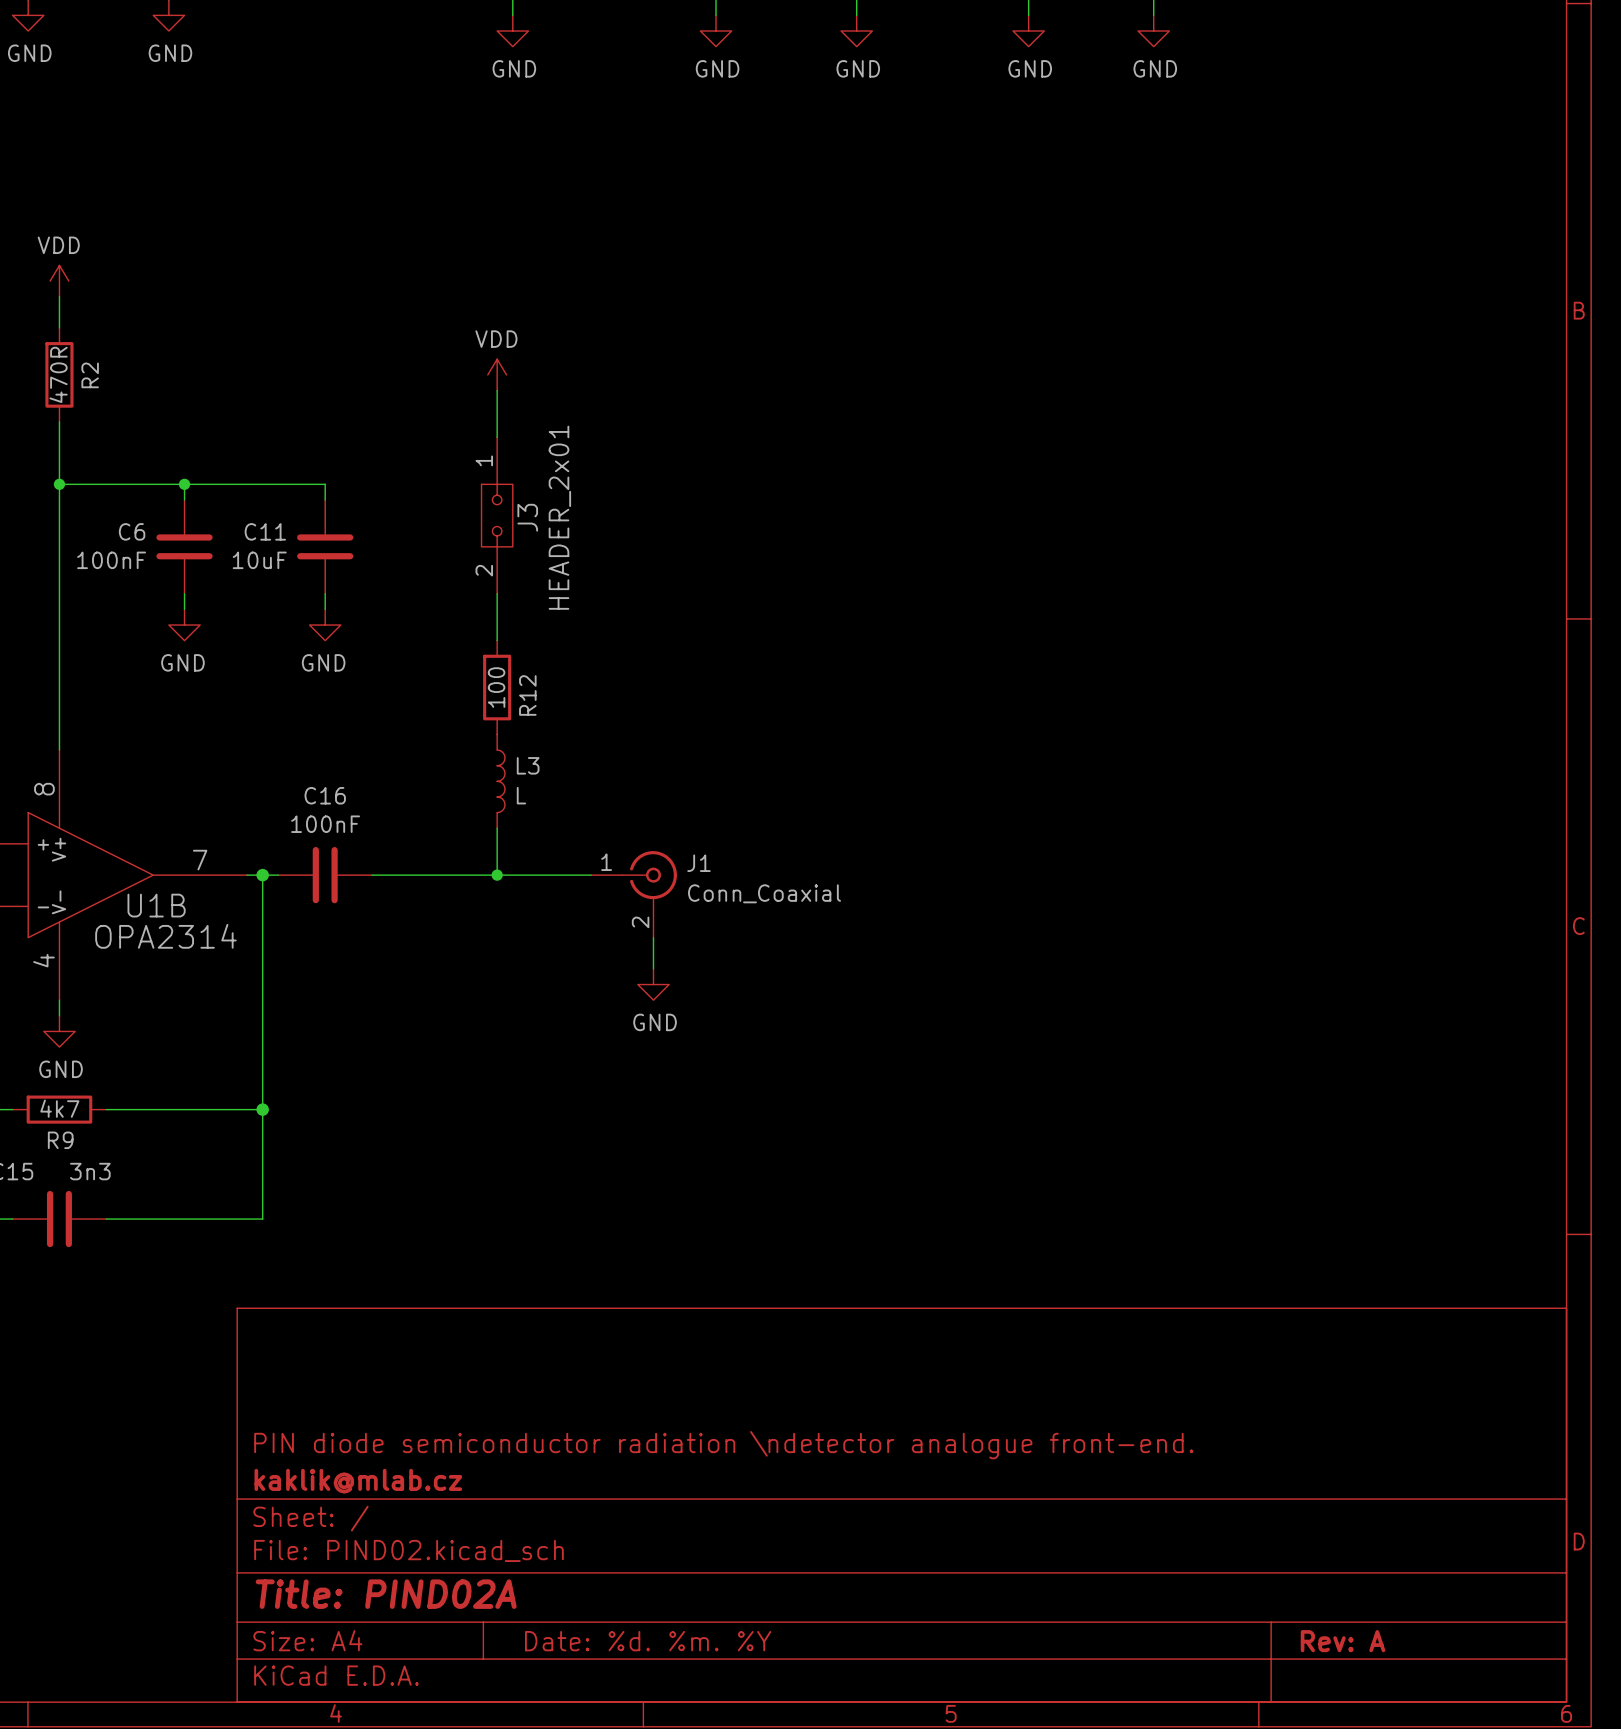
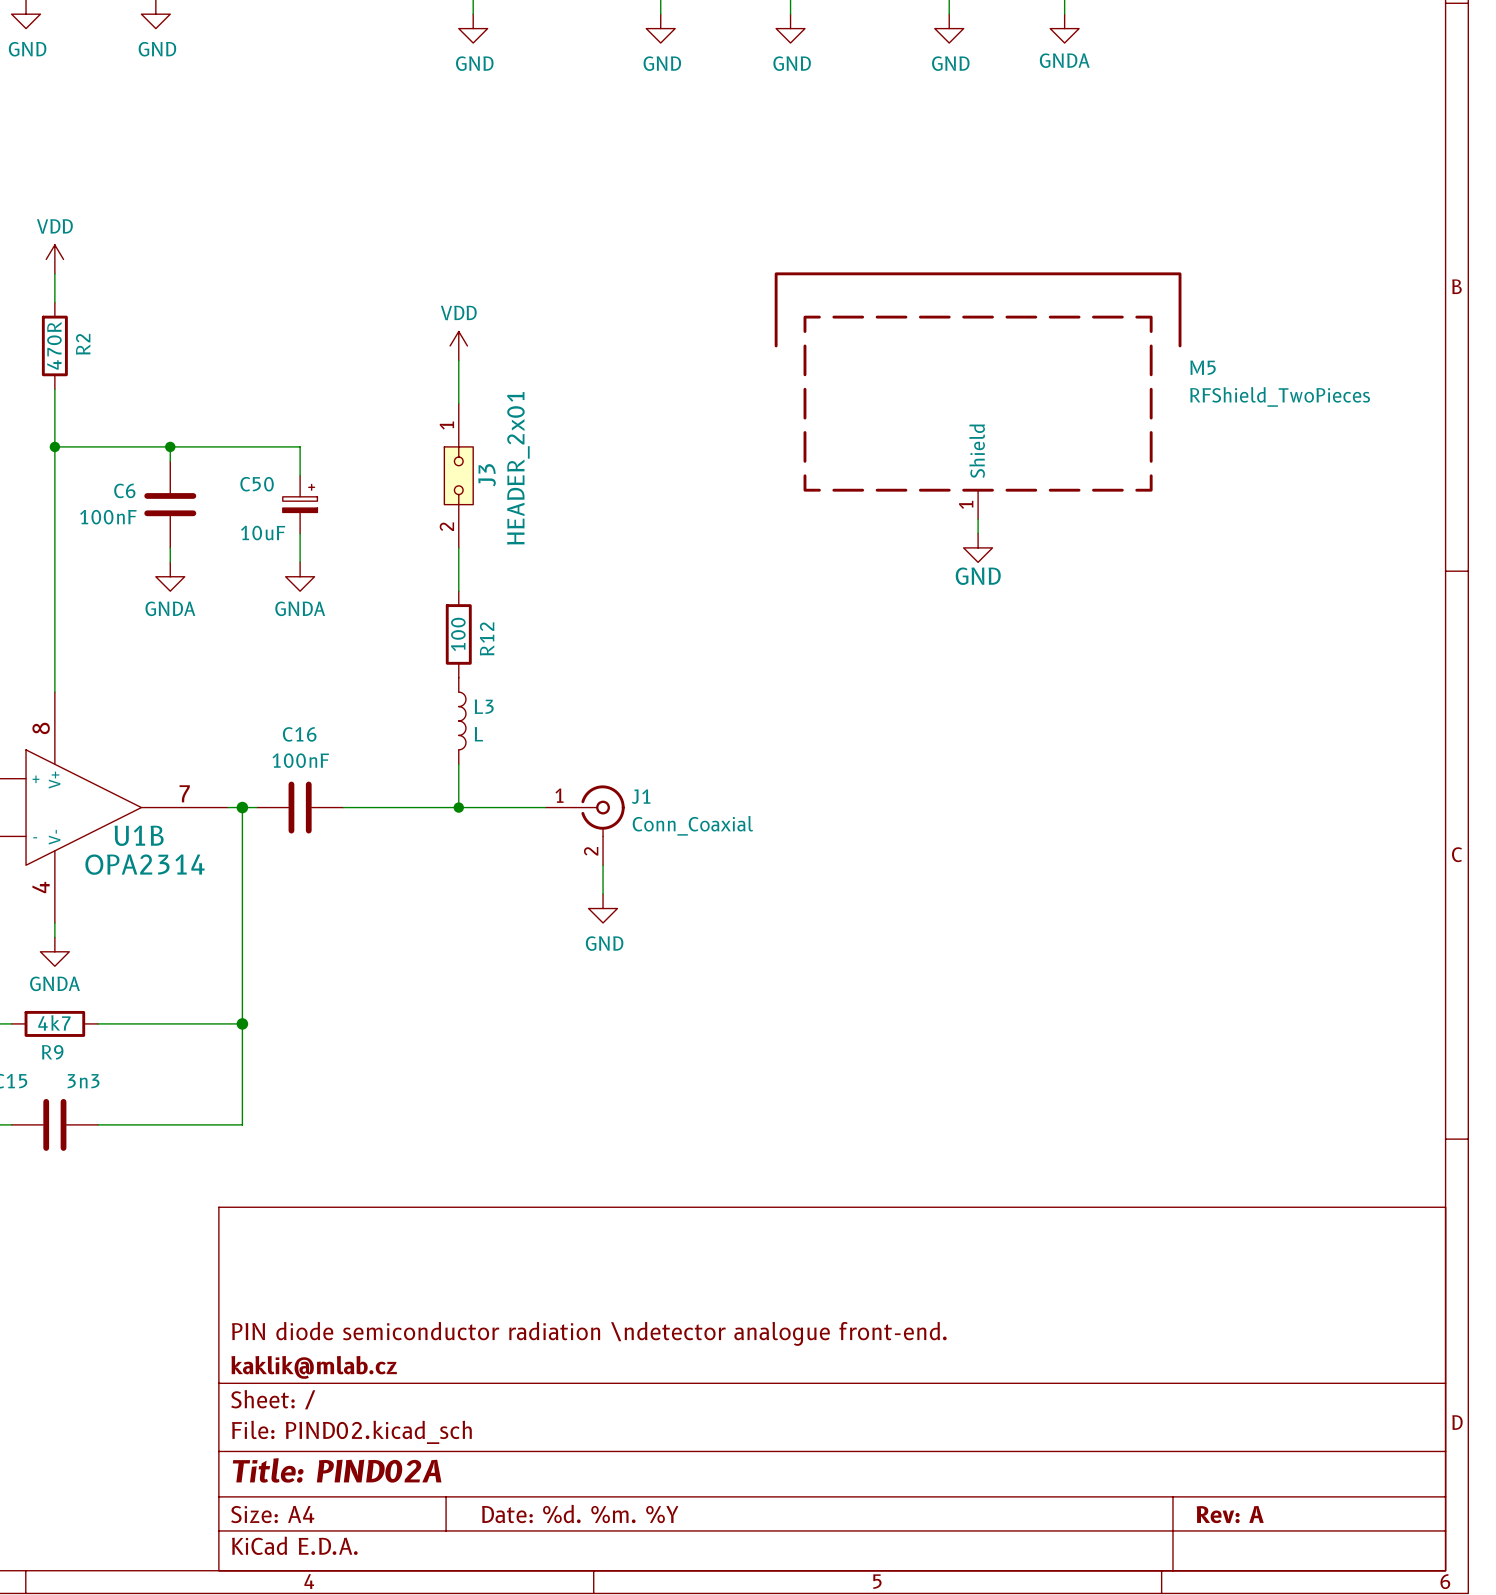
power symbol: GND (1153, 31) -> GNDA (1064, 28)
M5: none -> RFShield_TwoPieces (978, 395)
C11: 10uF (325, 546) -> none
C50: none -> 10uF (300, 504)
wire: none -> (978, 519) (978, 533)
power symbol: none -> GND (978, 547)
power symbol: GND (184, 625) -> GNDA (170, 576)
power symbol: GND (325, 625) -> GNDA (300, 576)
power symbol: GND (59, 1031) -> GNDA (54, 951)

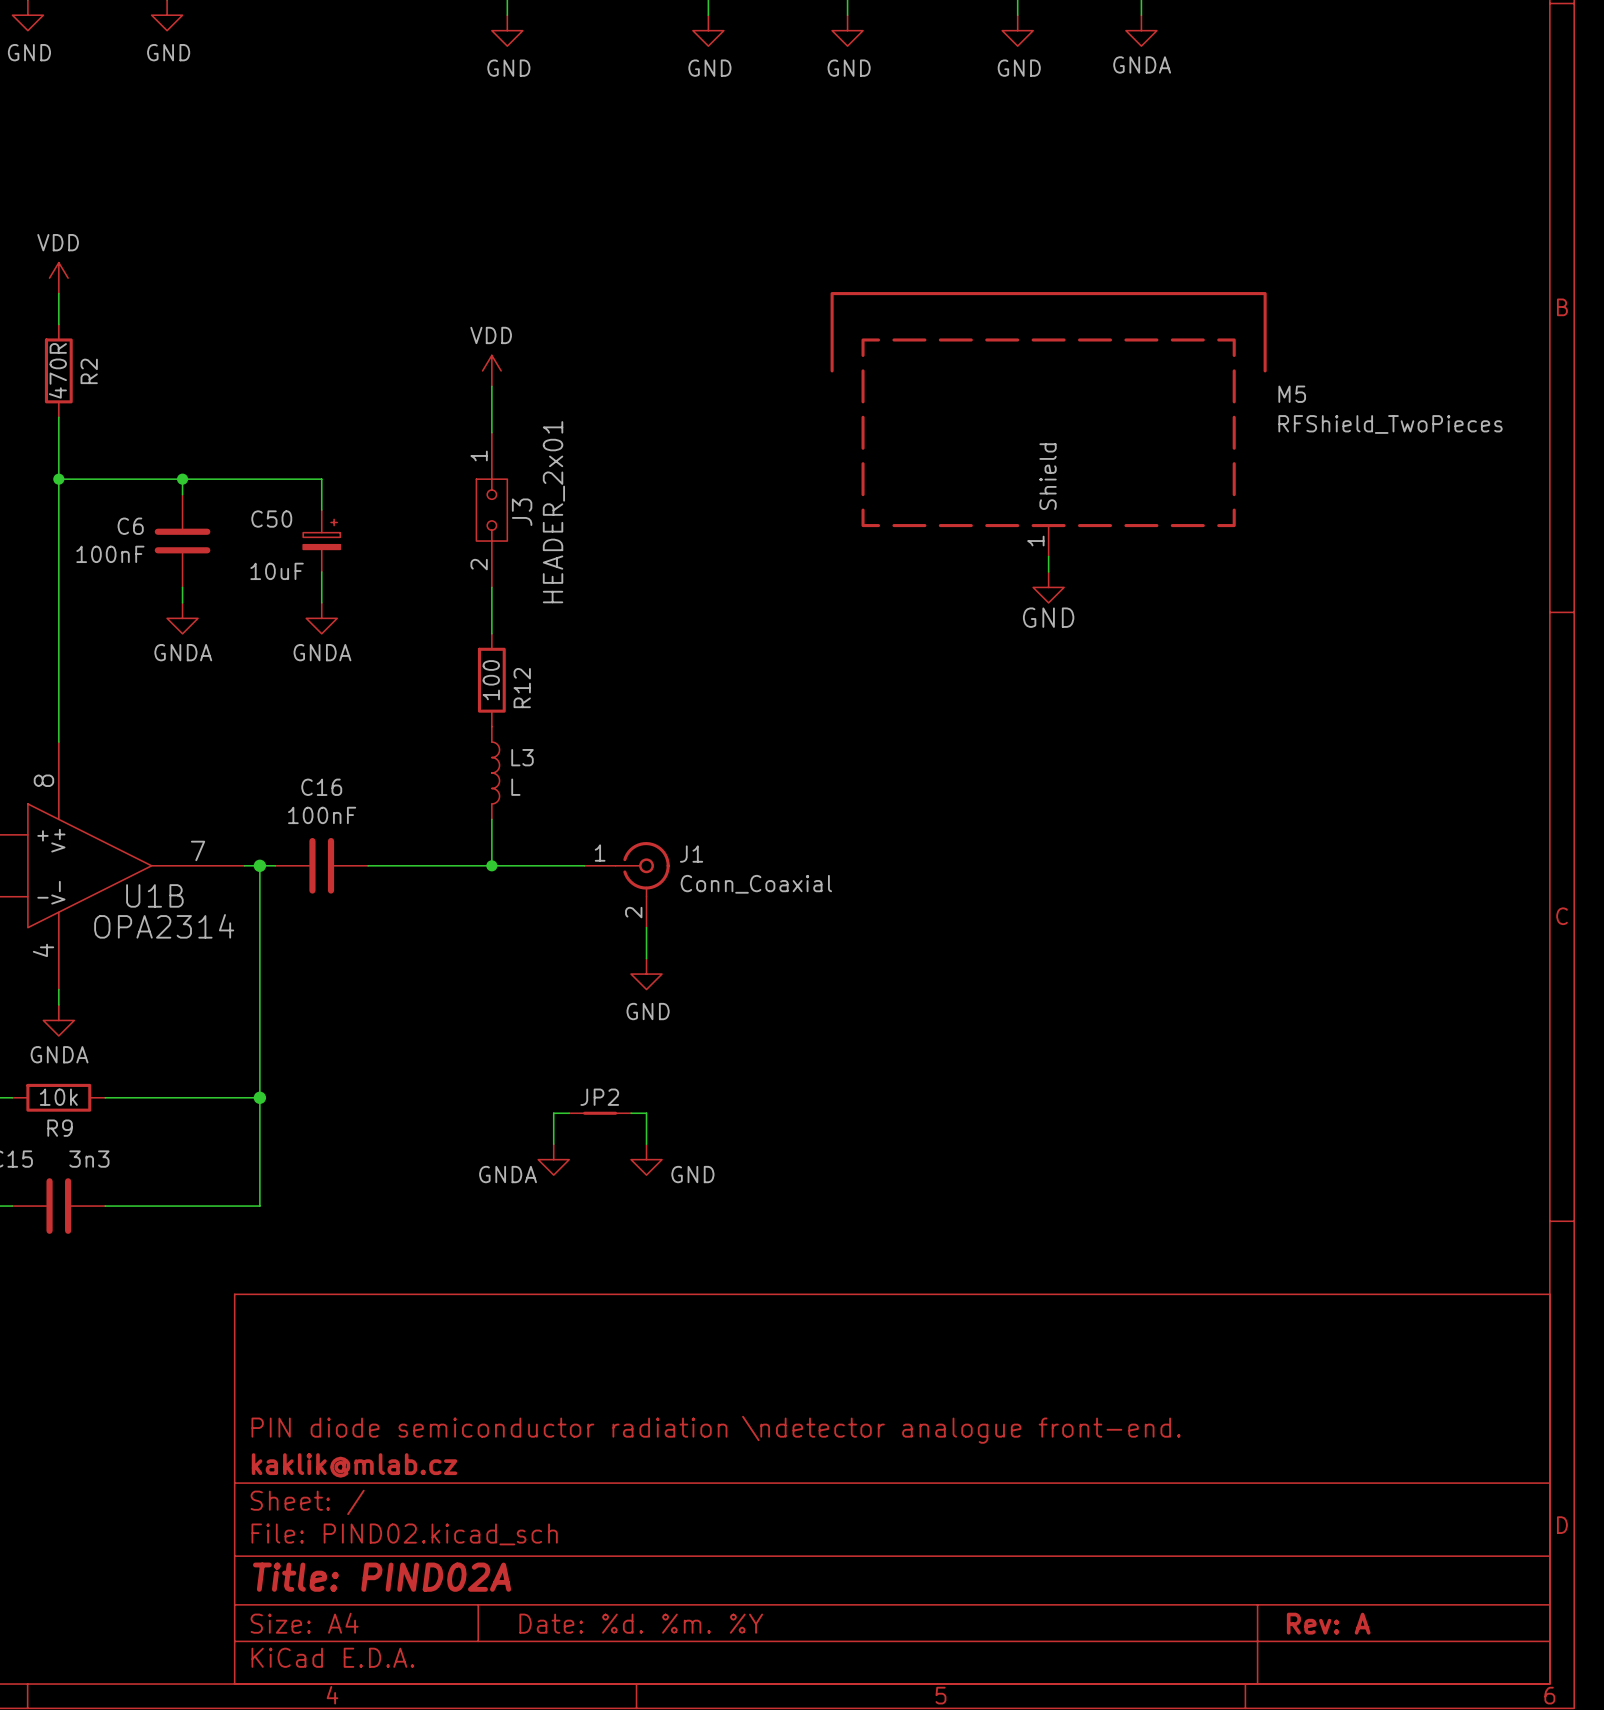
R9 value: 4k7 (54, 1022) -> 10k (58, 1097)
wire: none -> (569, 1113) (553, 1113) (553, 1144)
JP2: none -> (600, 1113)
wire: none -> (631, 1113) (646, 1113) (646, 1144)
power symbol: none -> GNDA (553, 1159)
power symbol: none -> GND (646, 1159)

